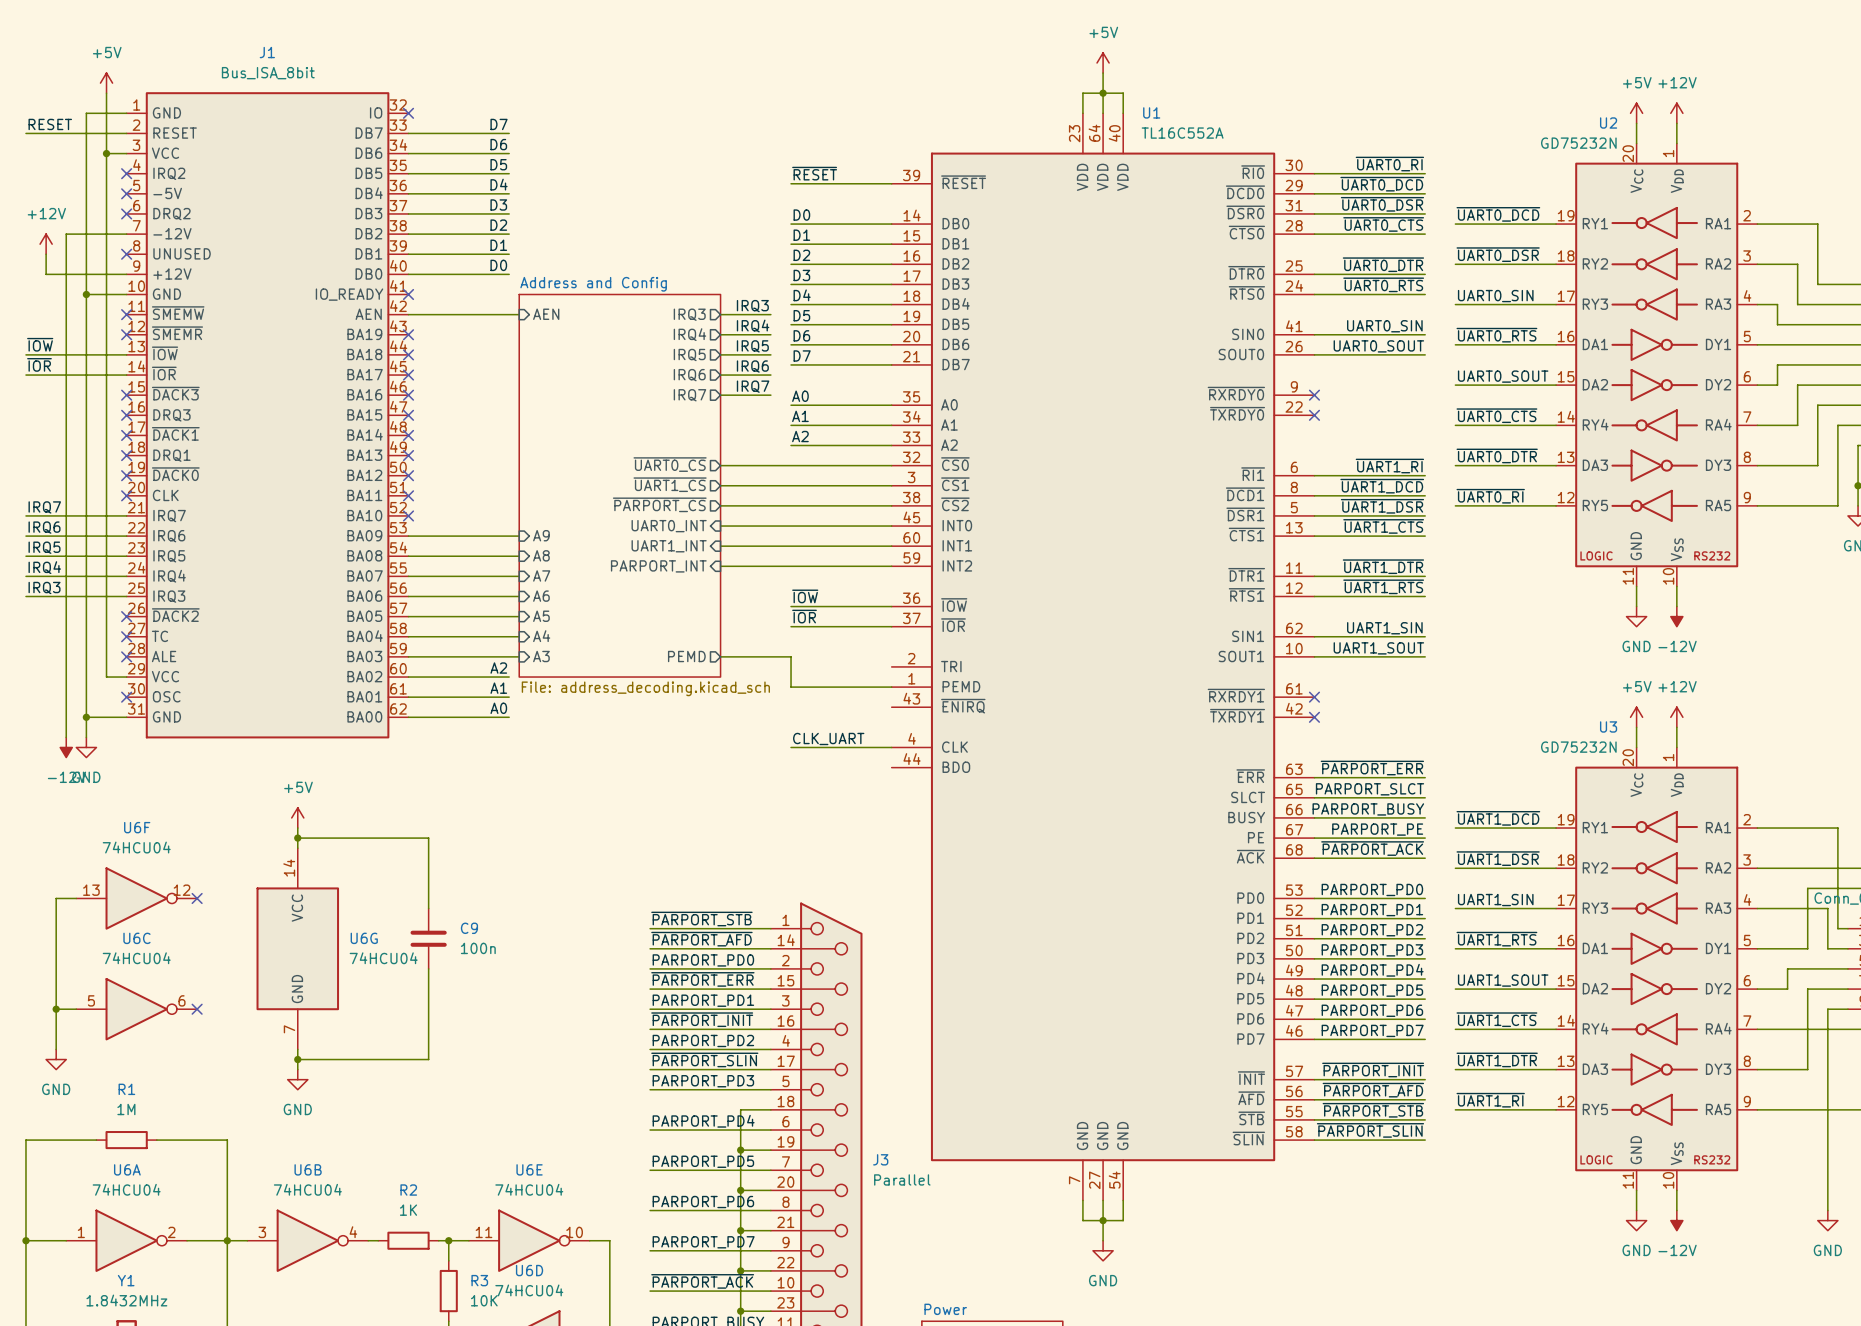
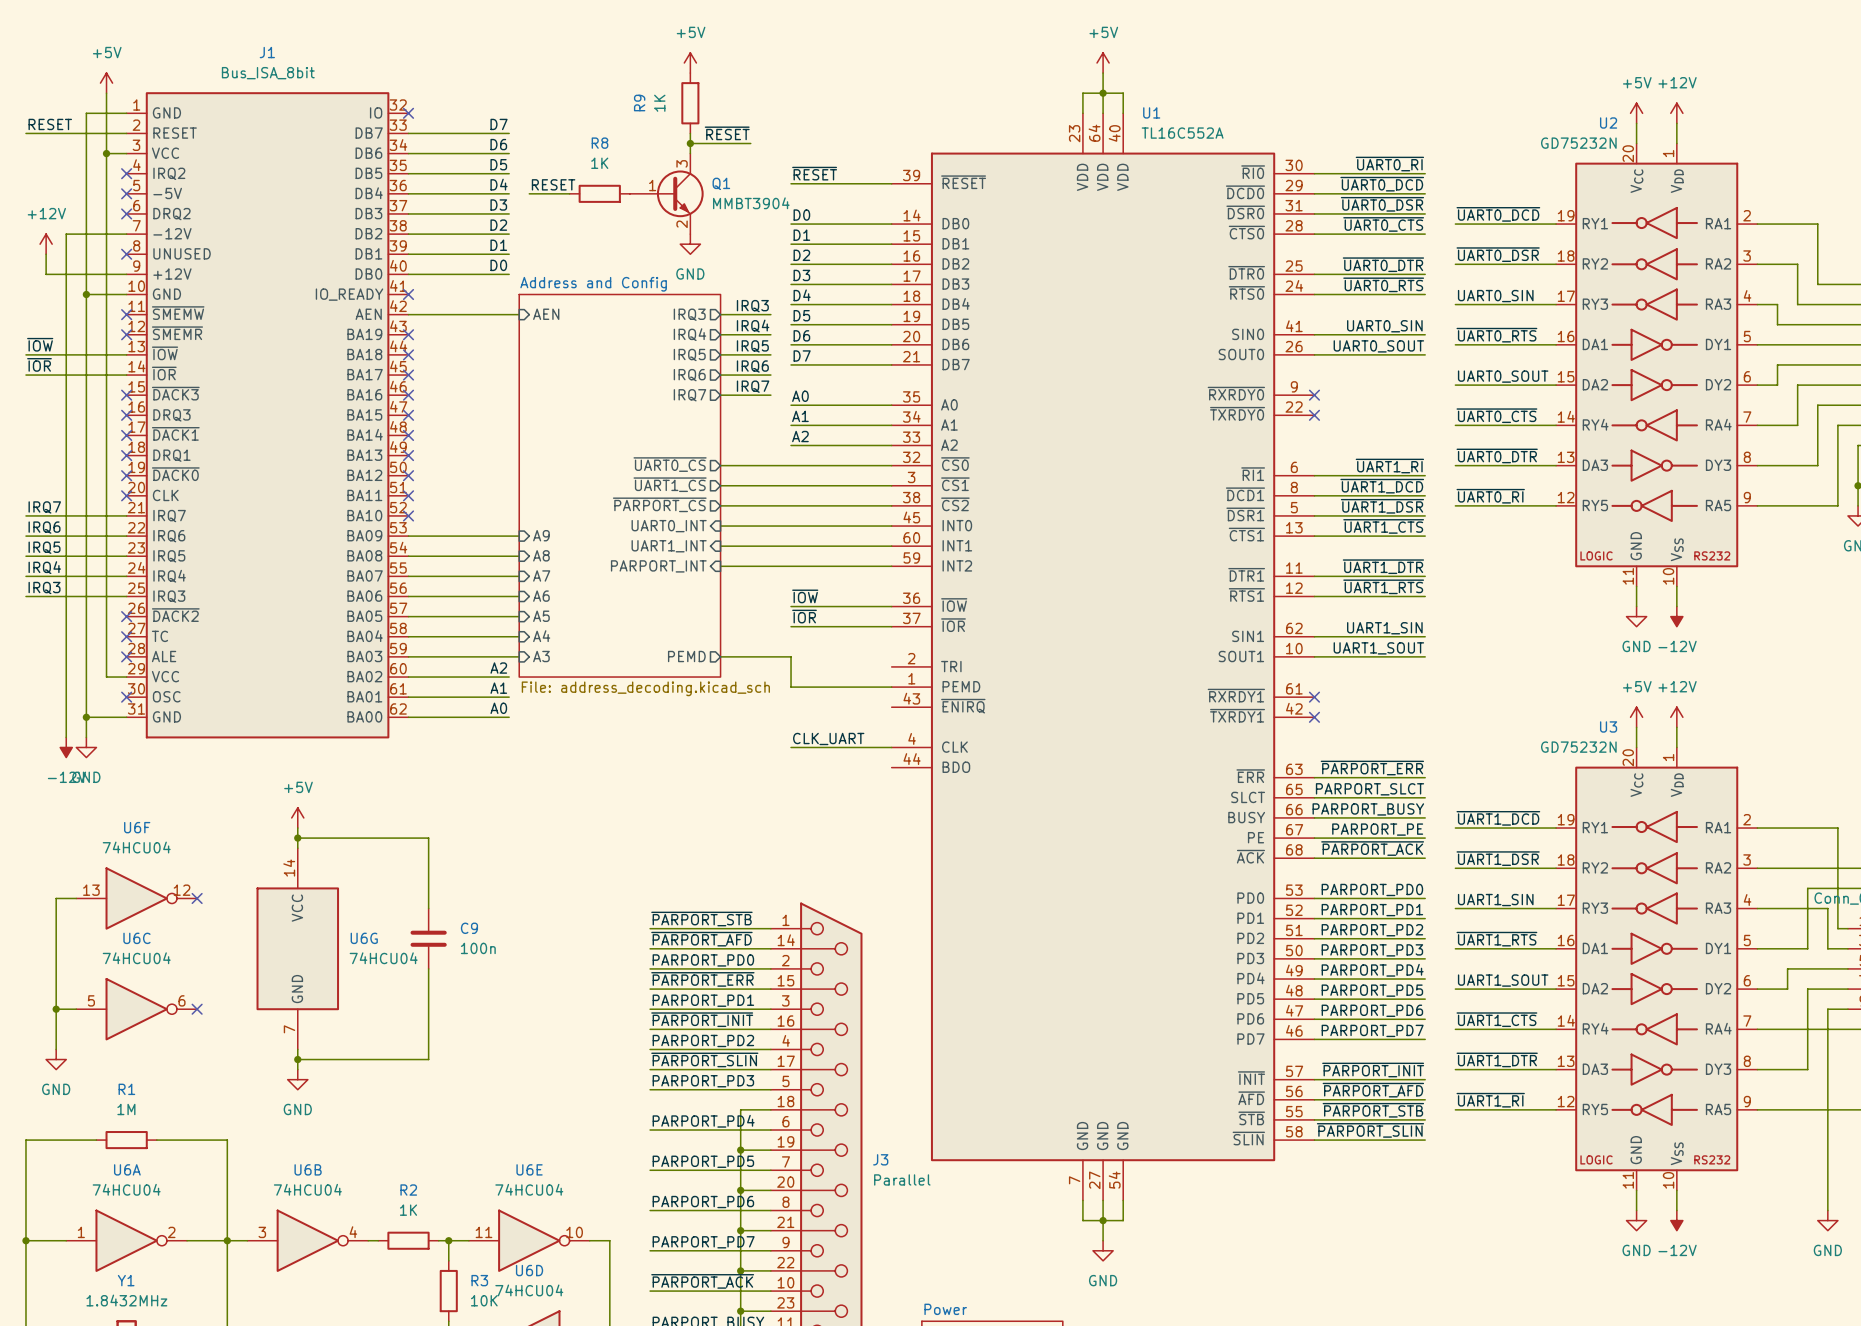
power symbol: none -> +5V (690, 62)
R9: none -> 1K (690, 103)
wire: none -> (690, 133) (690, 153)
label: none -> ~{RESET} (727, 133)
wire: none -> (690, 143) (750, 143)
junction: none -> (690, 143)
label: none -> RESET (553, 184)
wire: none -> (529, 193) (569, 193)
R8: none -> 1K (599, 193)
Q1: none -> MMBT3904 (666, 193)
power symbol: none -> GND (690, 244)

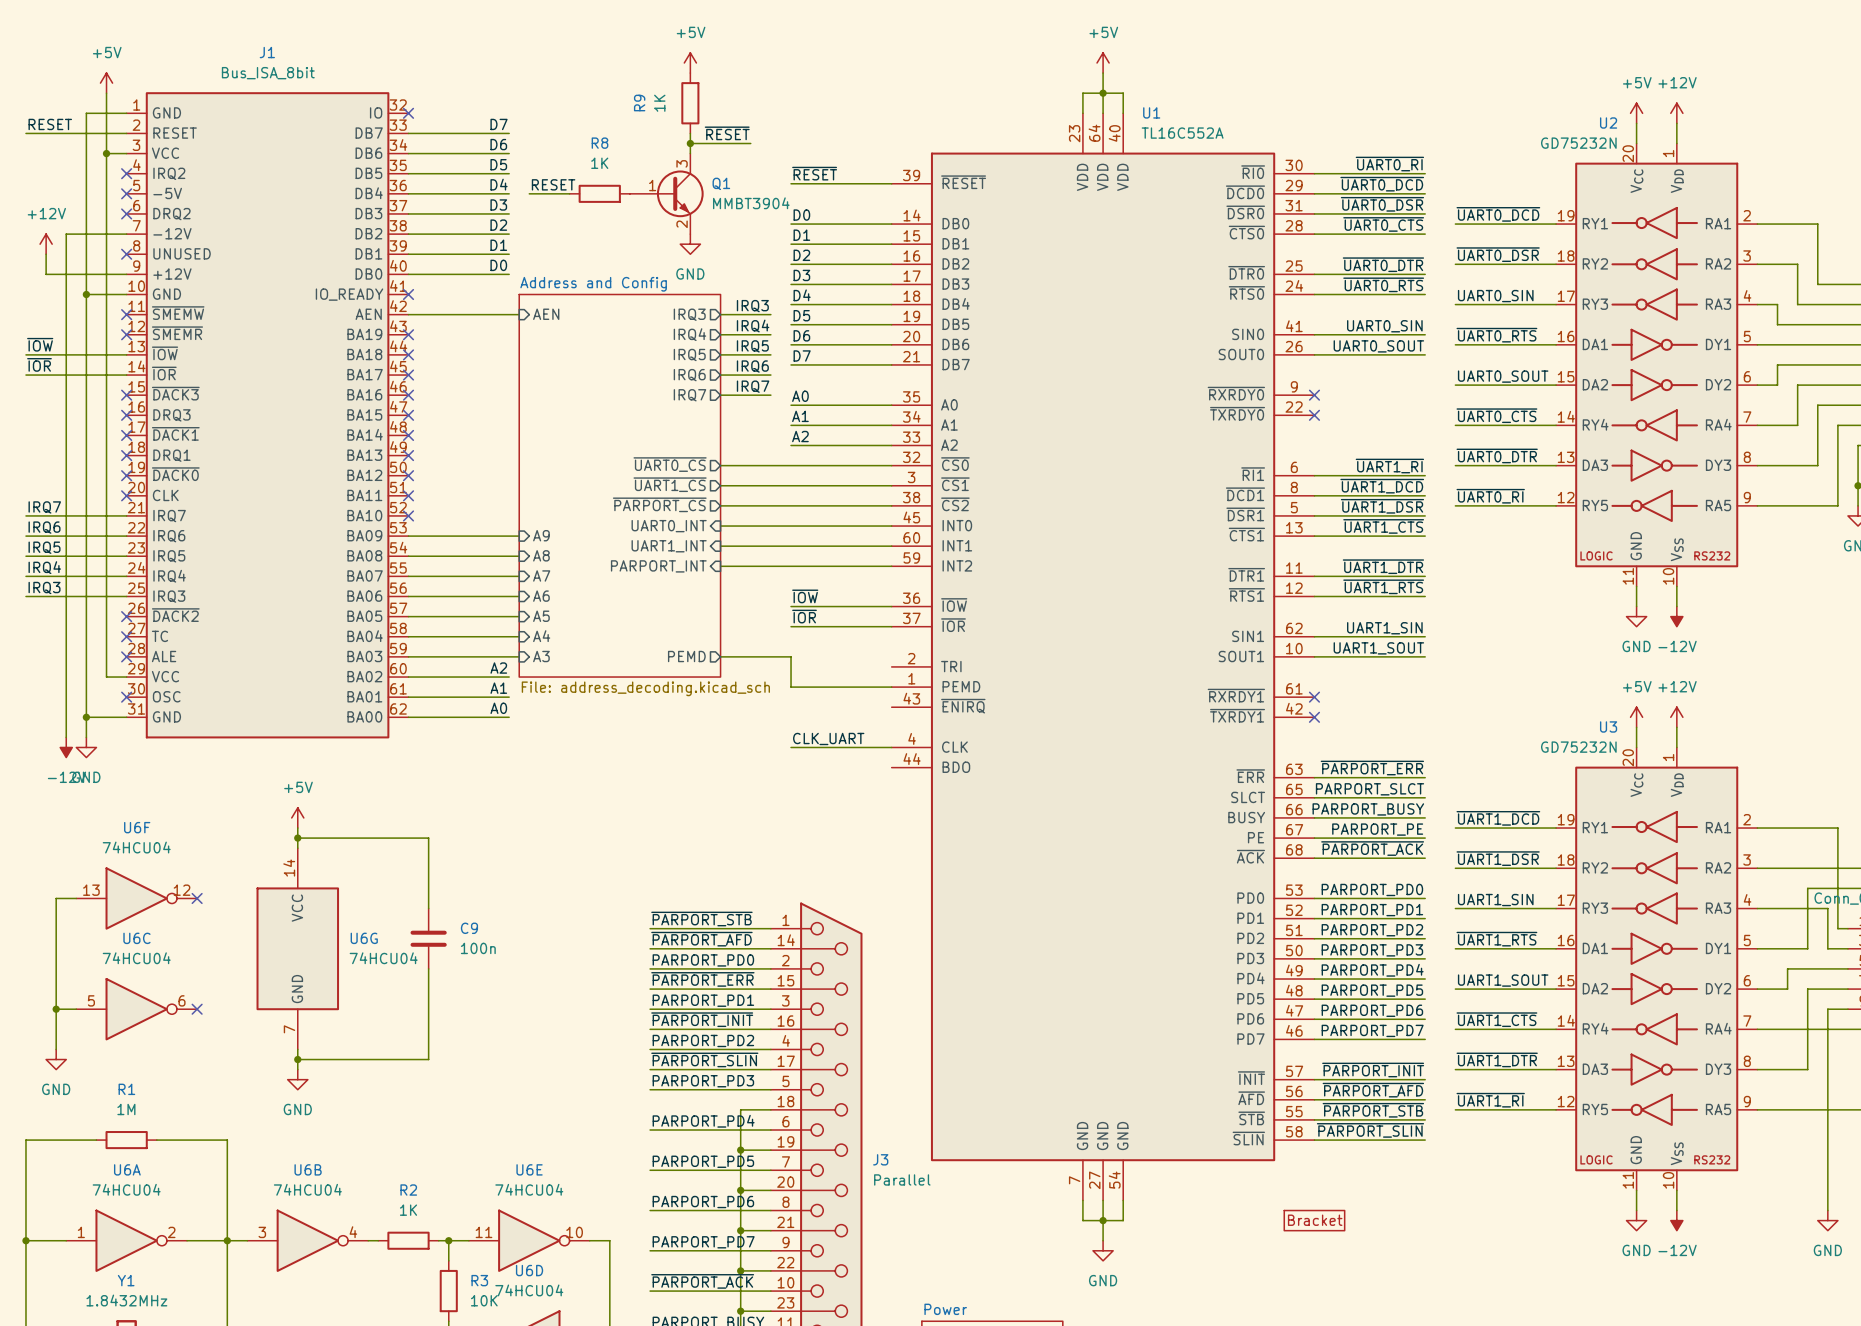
part: none -> (1314, 1220)

